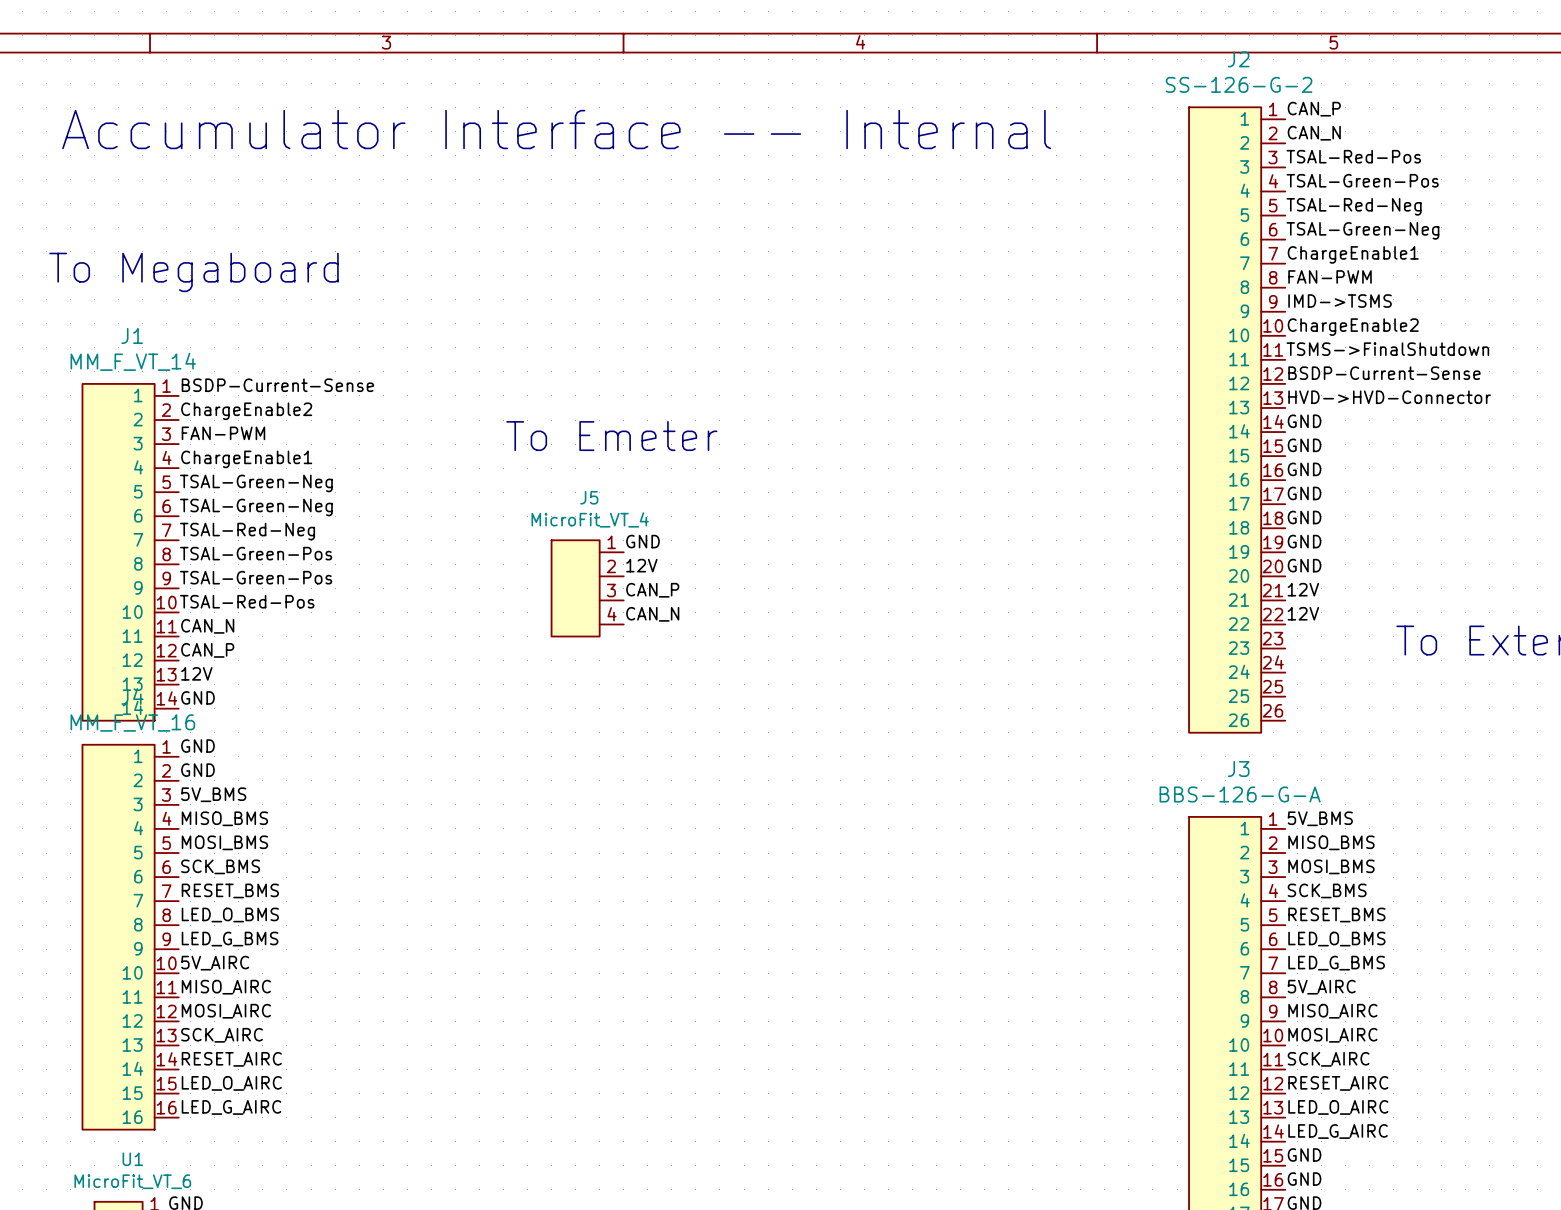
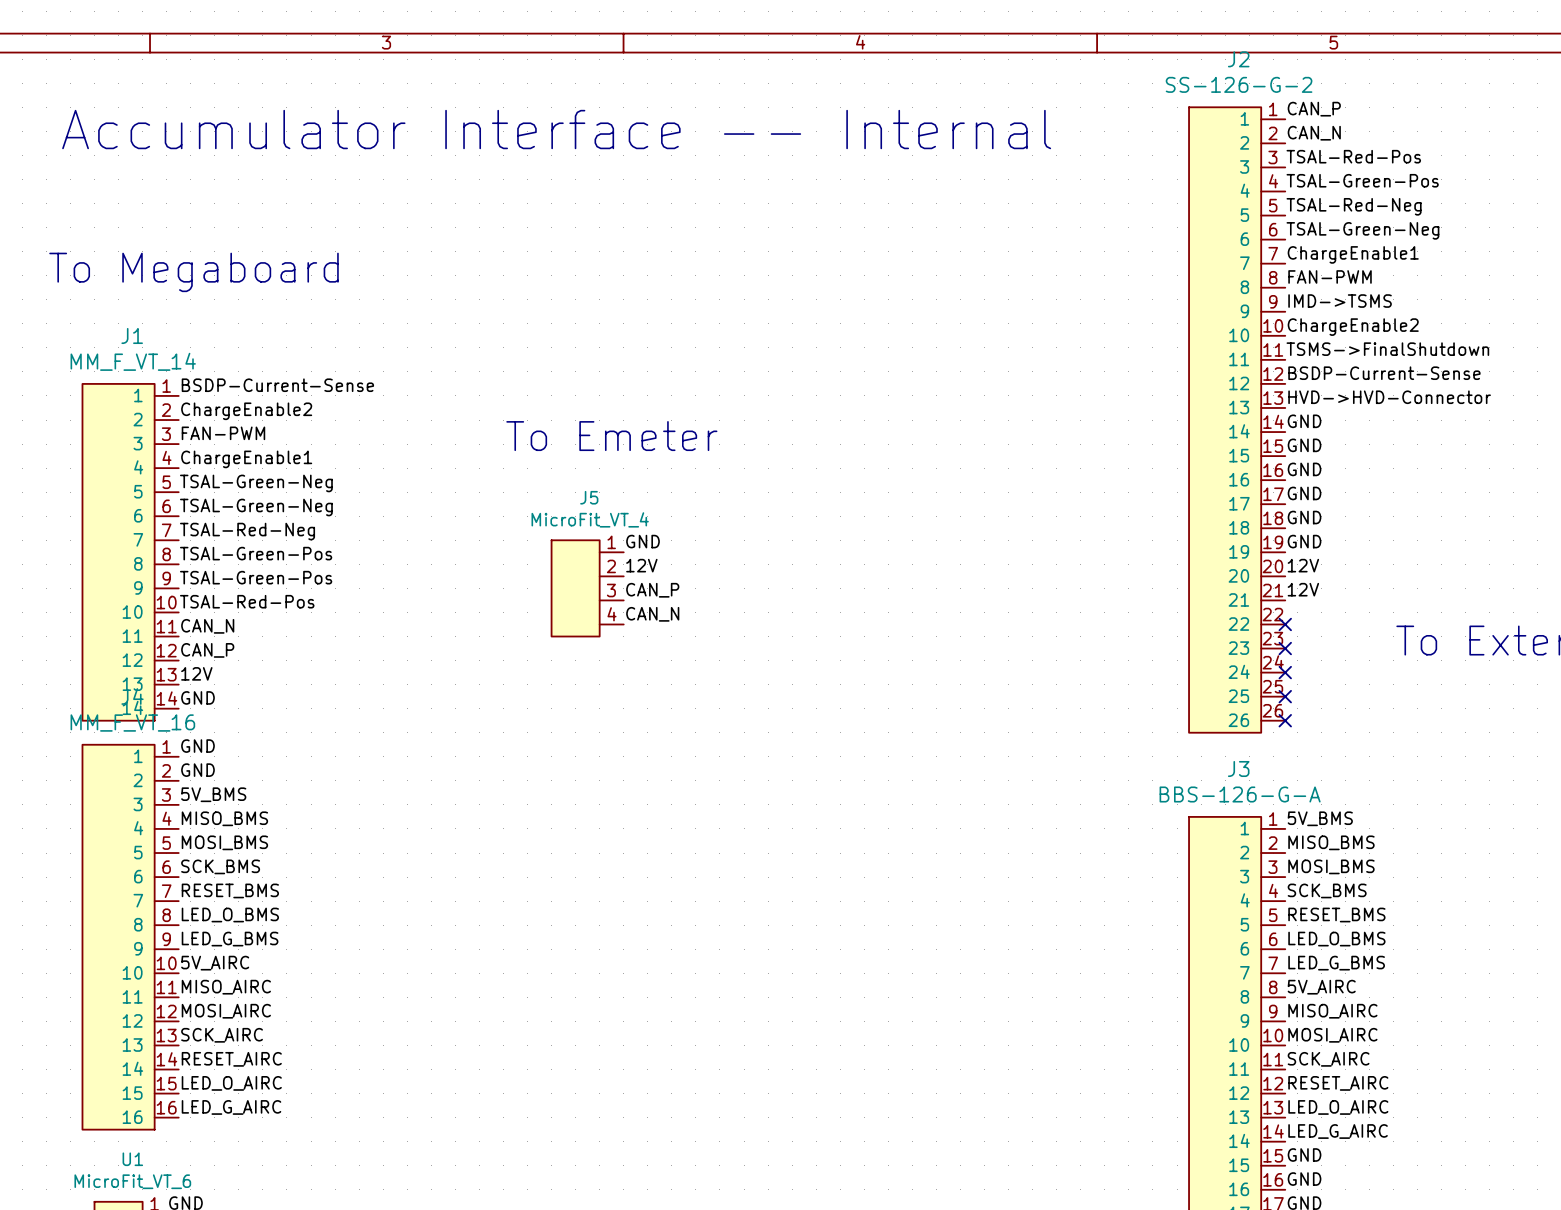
label: GND (1304, 565) -> 12V (1303, 565)
label: 12V (1303, 613) -> none
no-connect mark: none -> (1285, 624)
no-connect mark: none -> (1285, 648)
no-connect mark: none -> (1285, 672)
no-connect mark: none -> (1285, 696)
no-connect mark: none -> (1285, 720)

